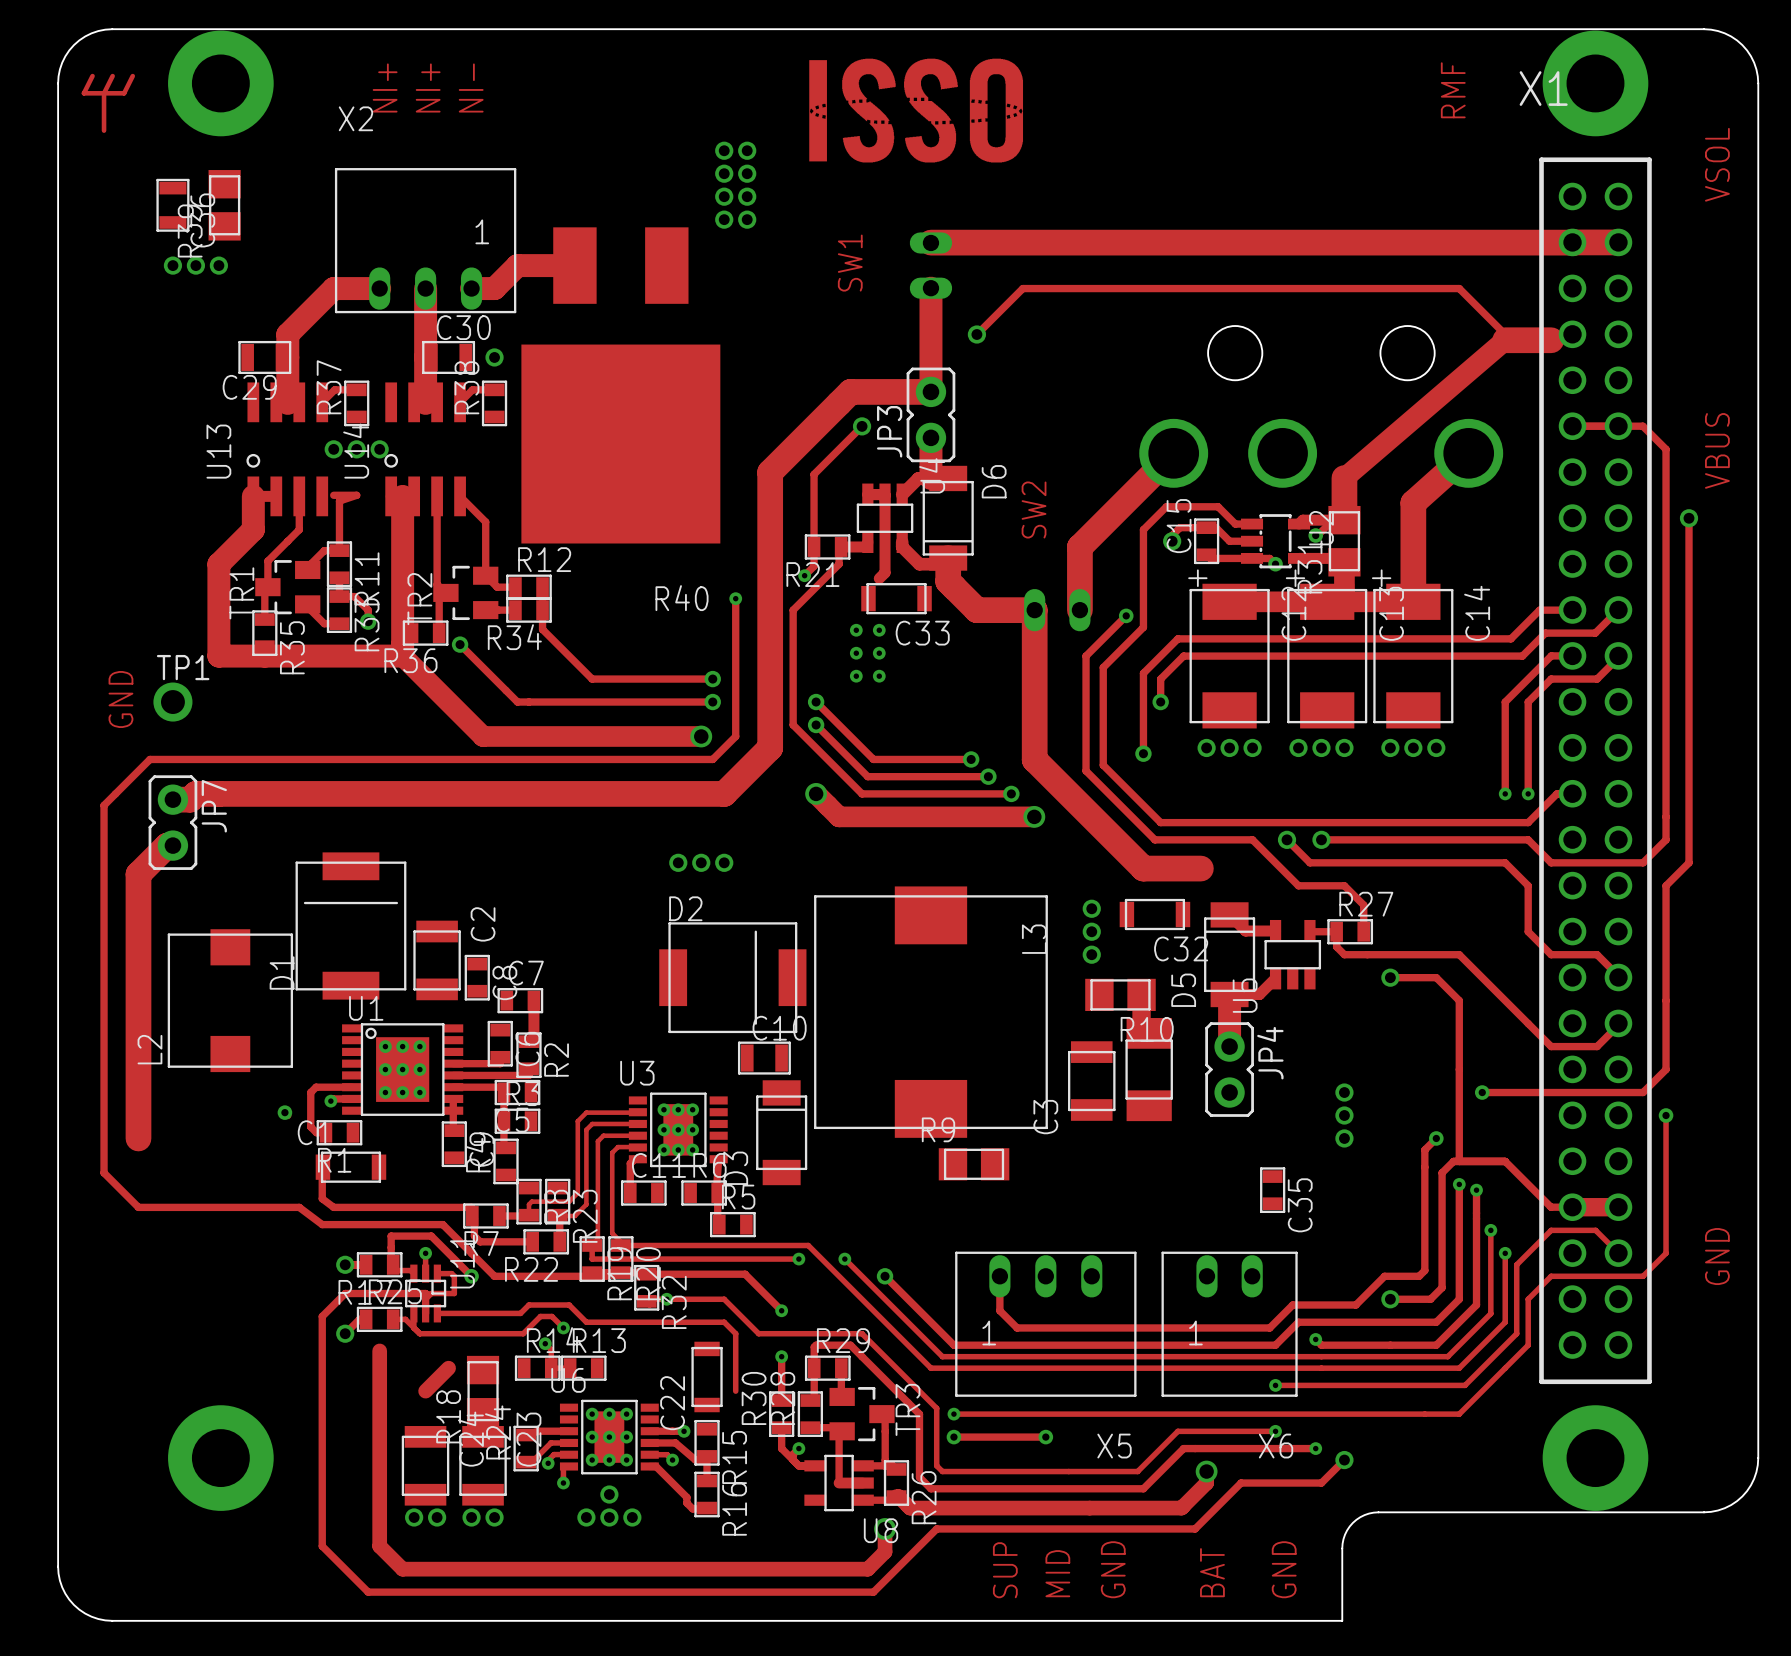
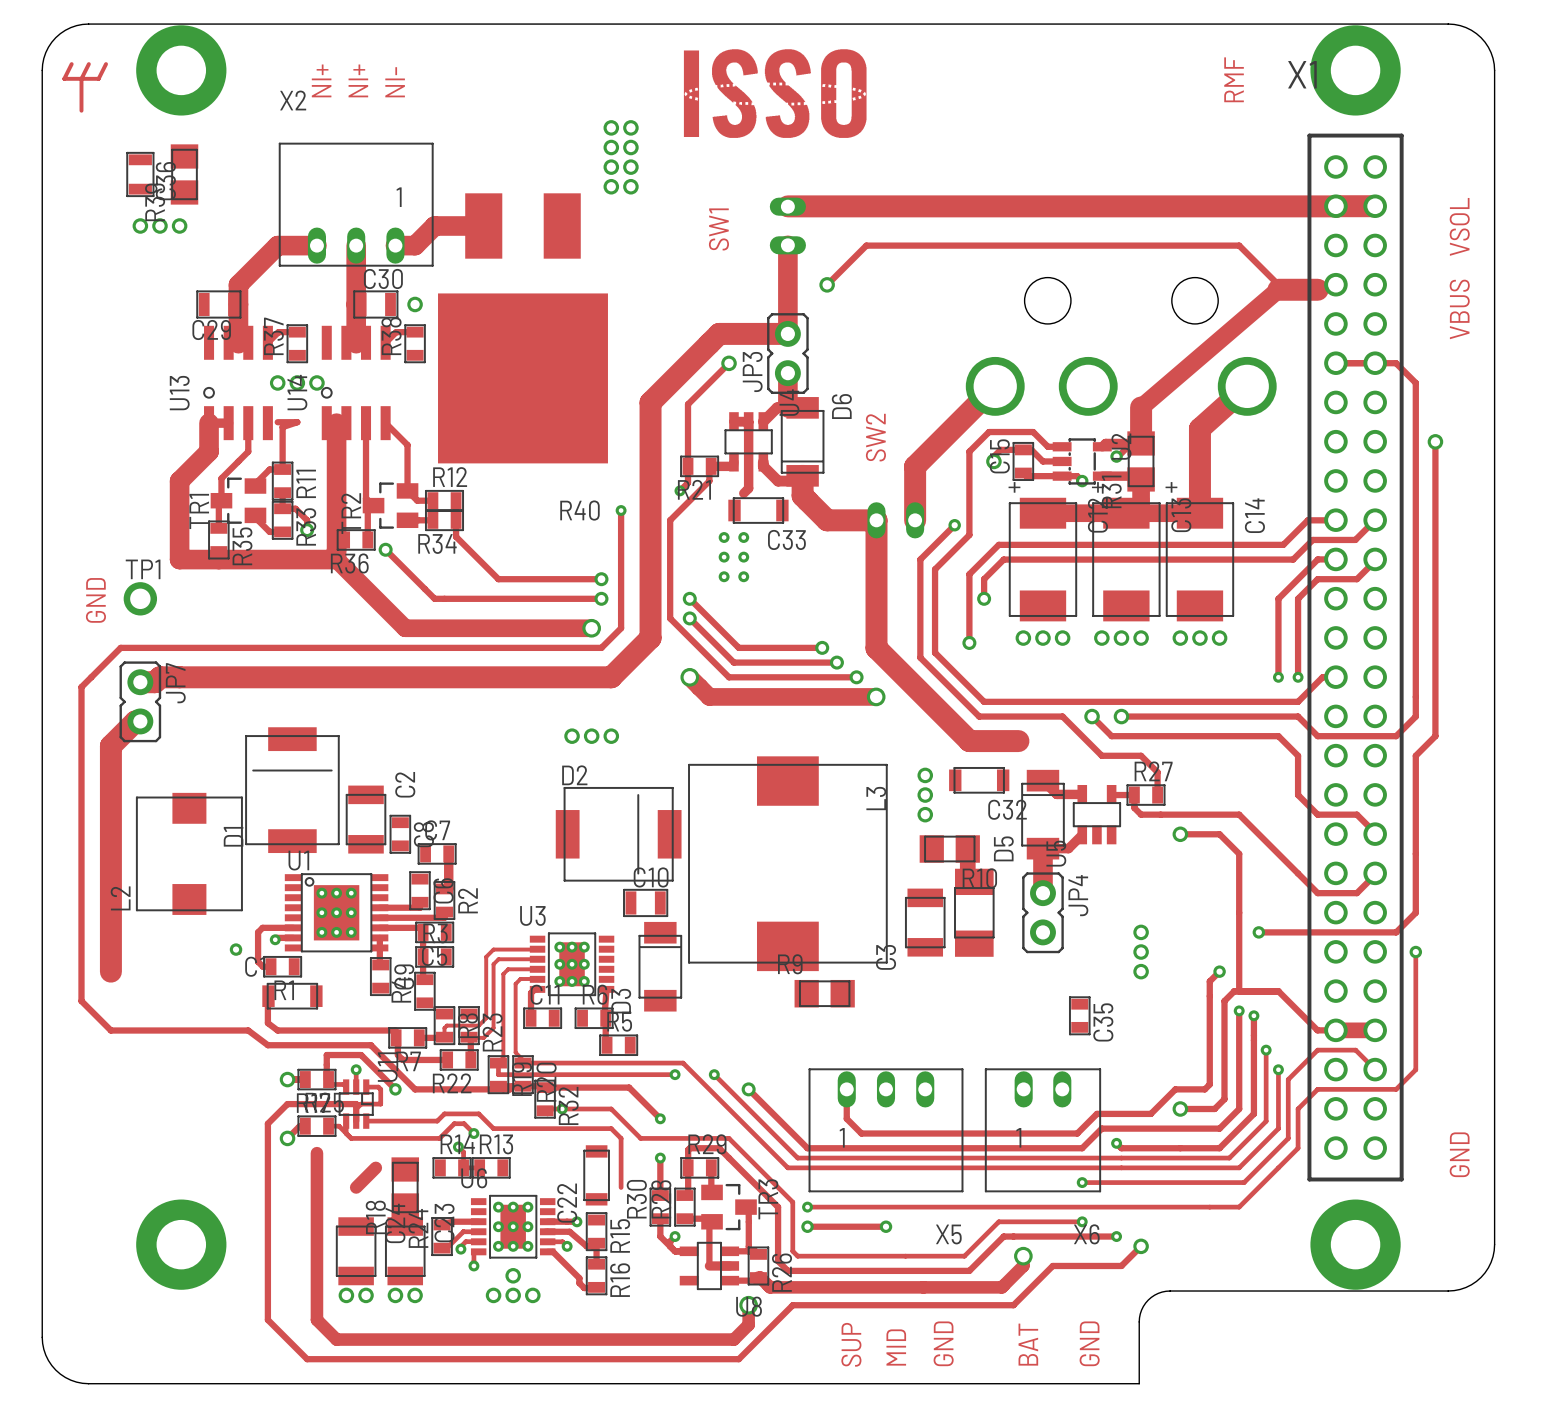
text position: VSOL (1717, 164) -> VSOL (1459, 226)
text position: VBUS (1717, 450) -> VBUS (1459, 309)
text position: GND (1717, 1256) -> GND (1459, 1154)

